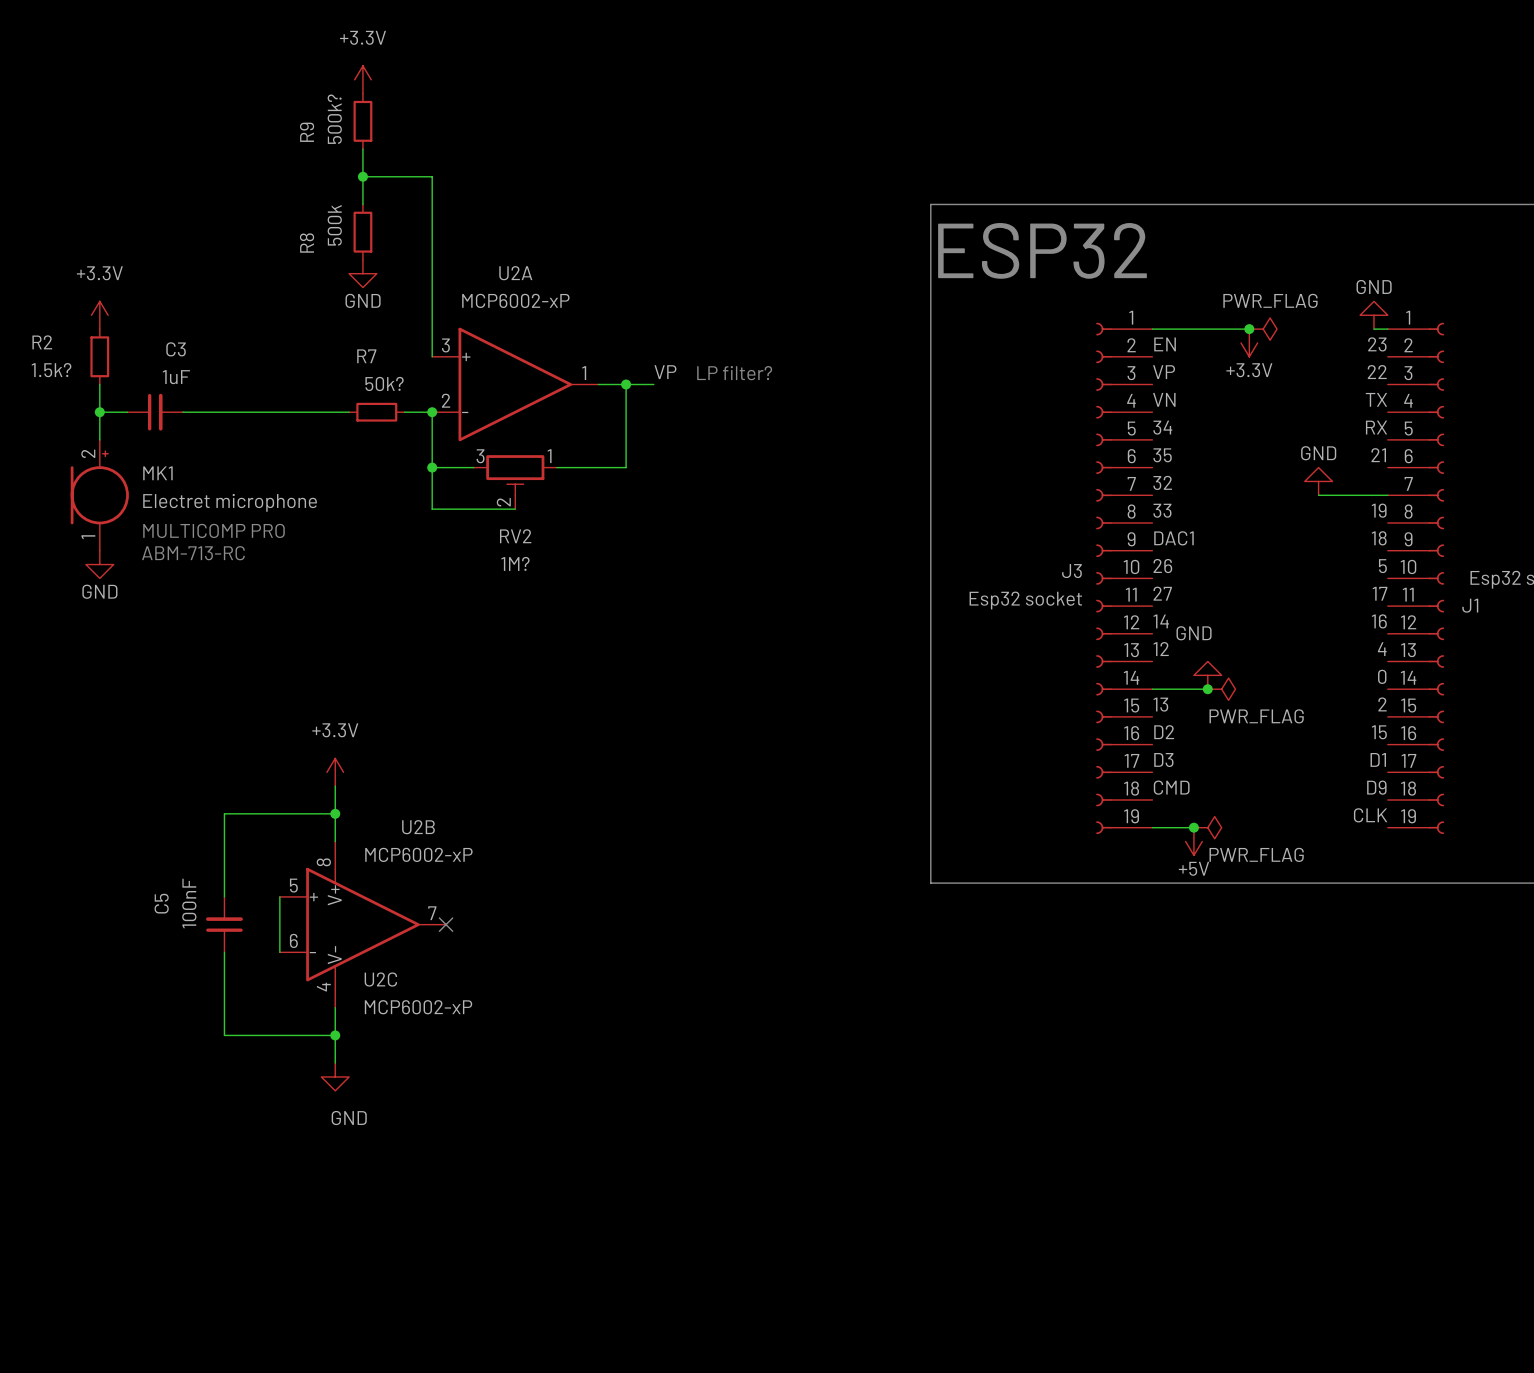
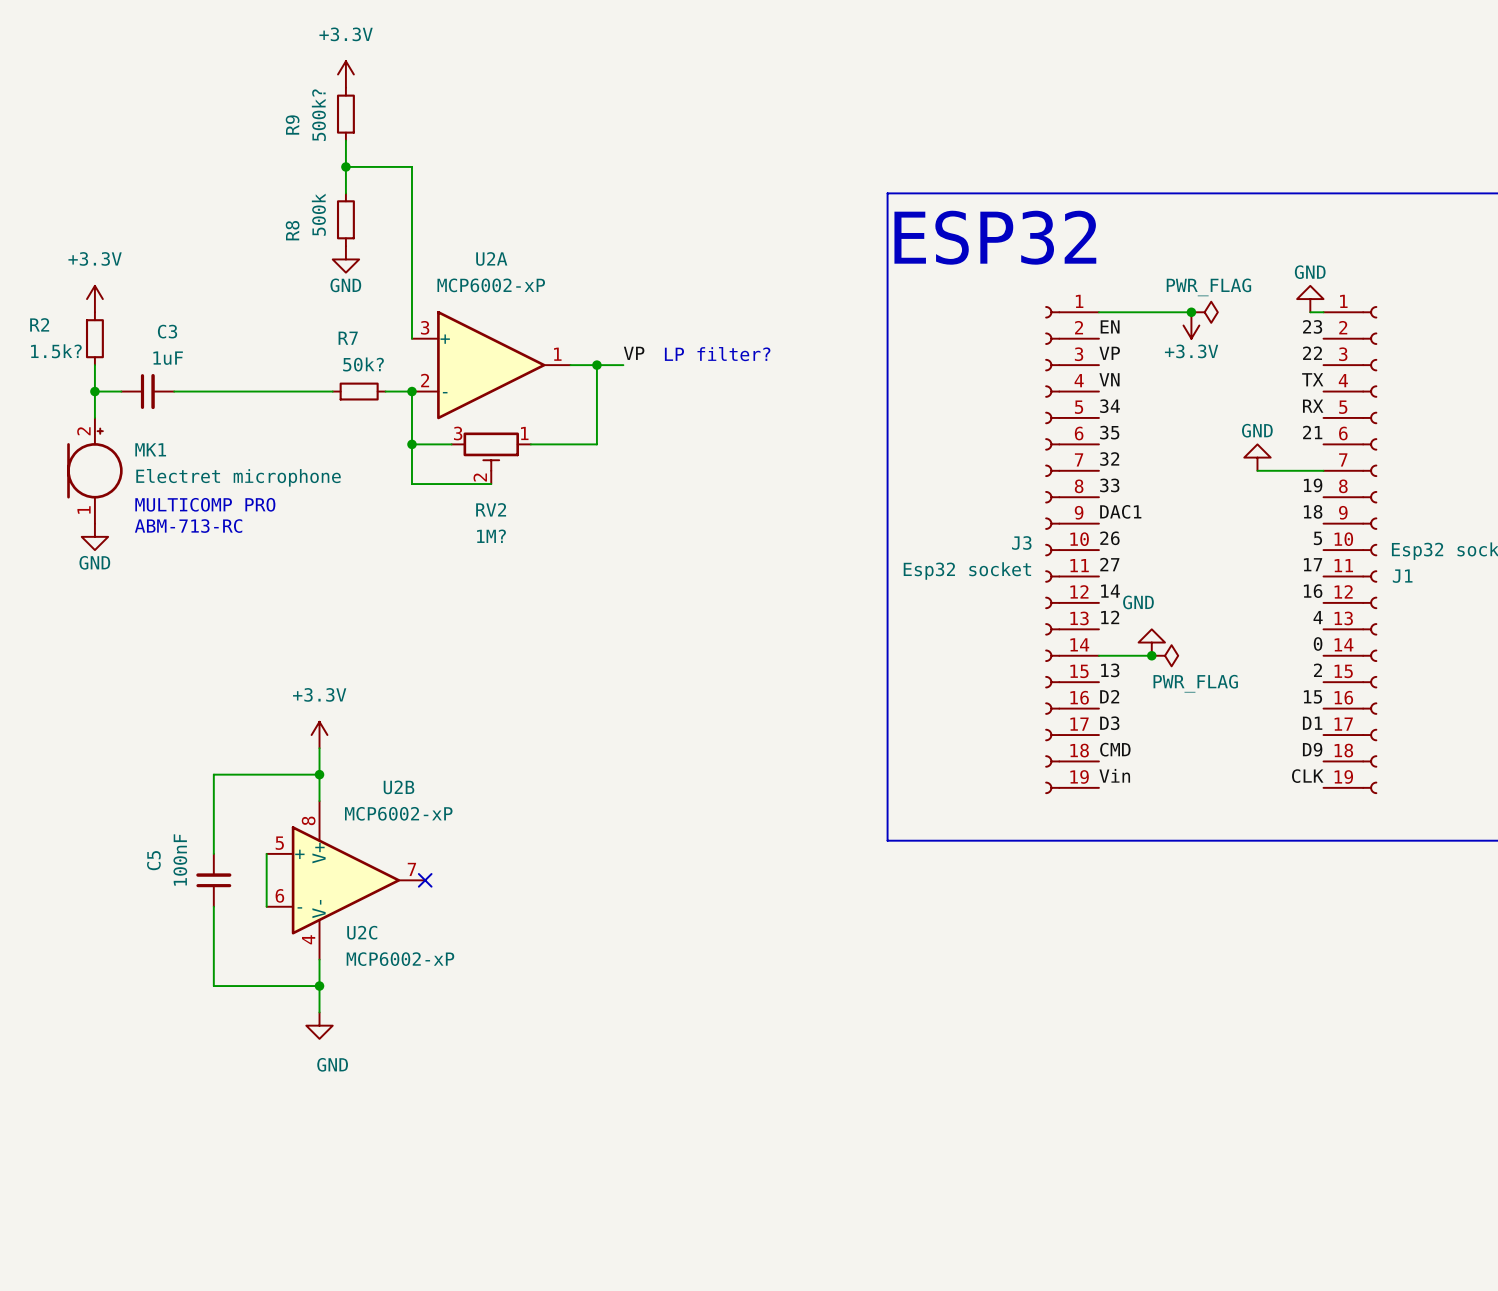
label: none -> Vin (1114, 775)
wire: (1152, 827) (1193, 827) -> none
junction: (1193, 827) -> none
power symbol: PWR_FLAG (1207, 827) -> none
power symbol: +5V (1193, 841) -> none

